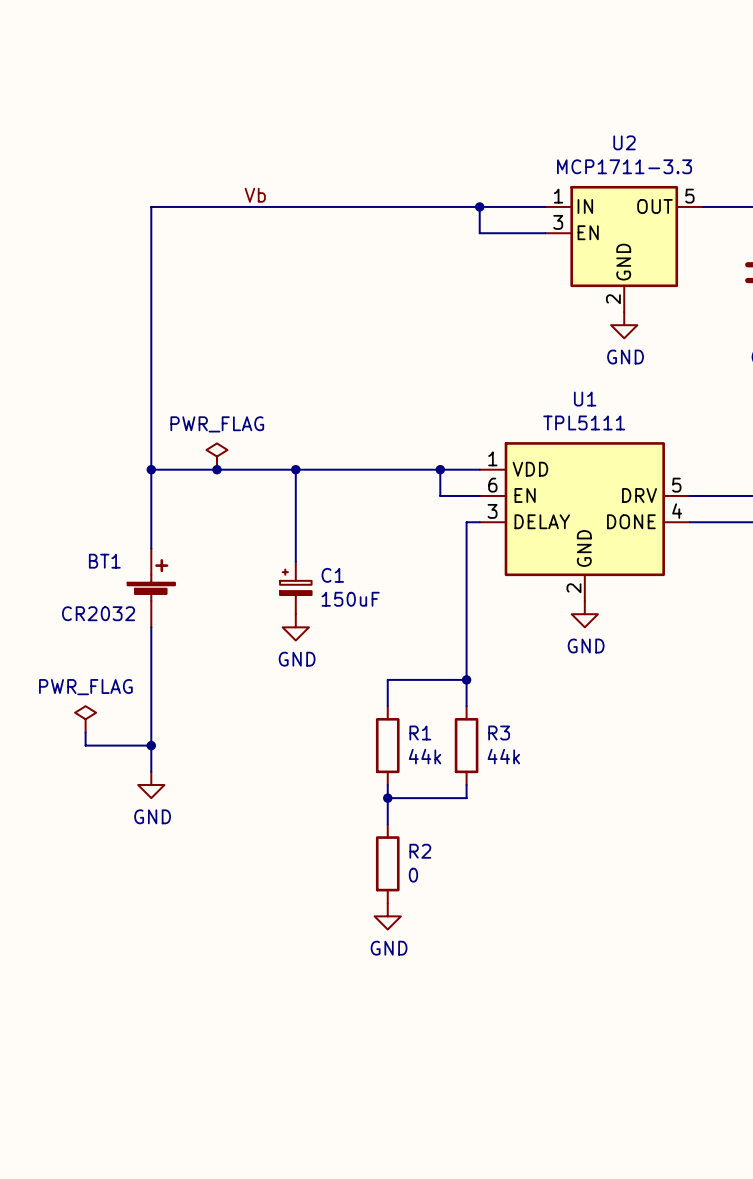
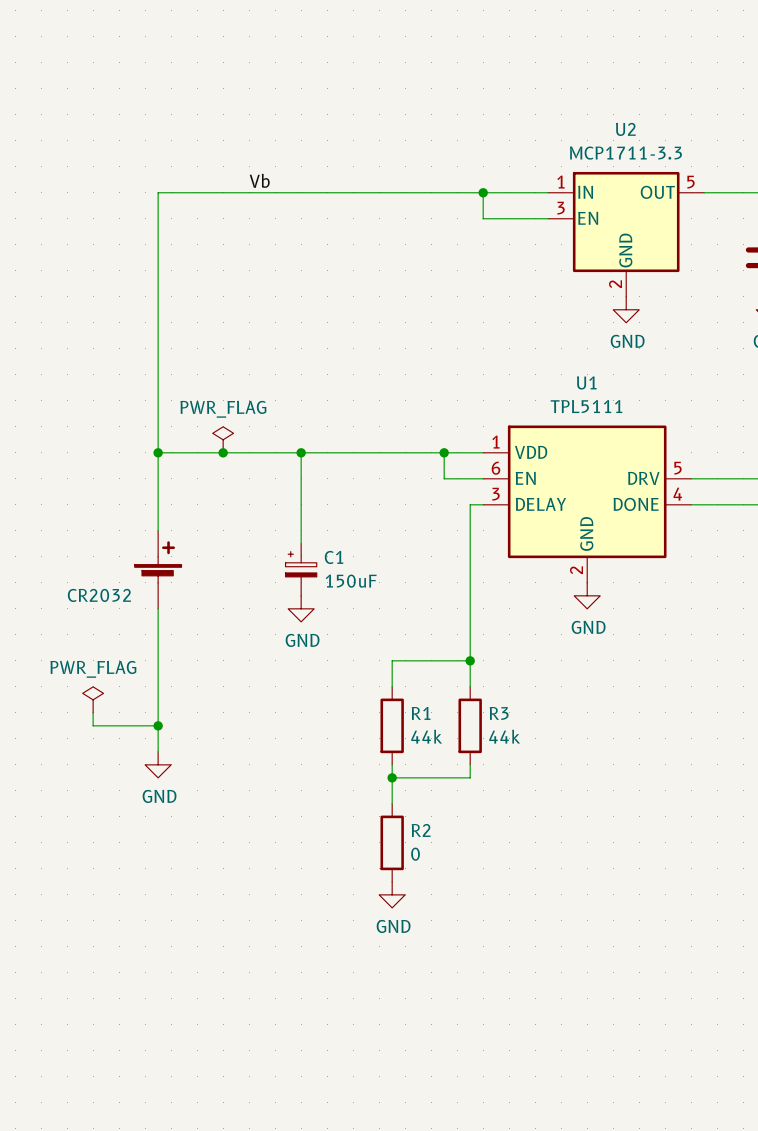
BT1 name: BT1 (104, 561) -> none

